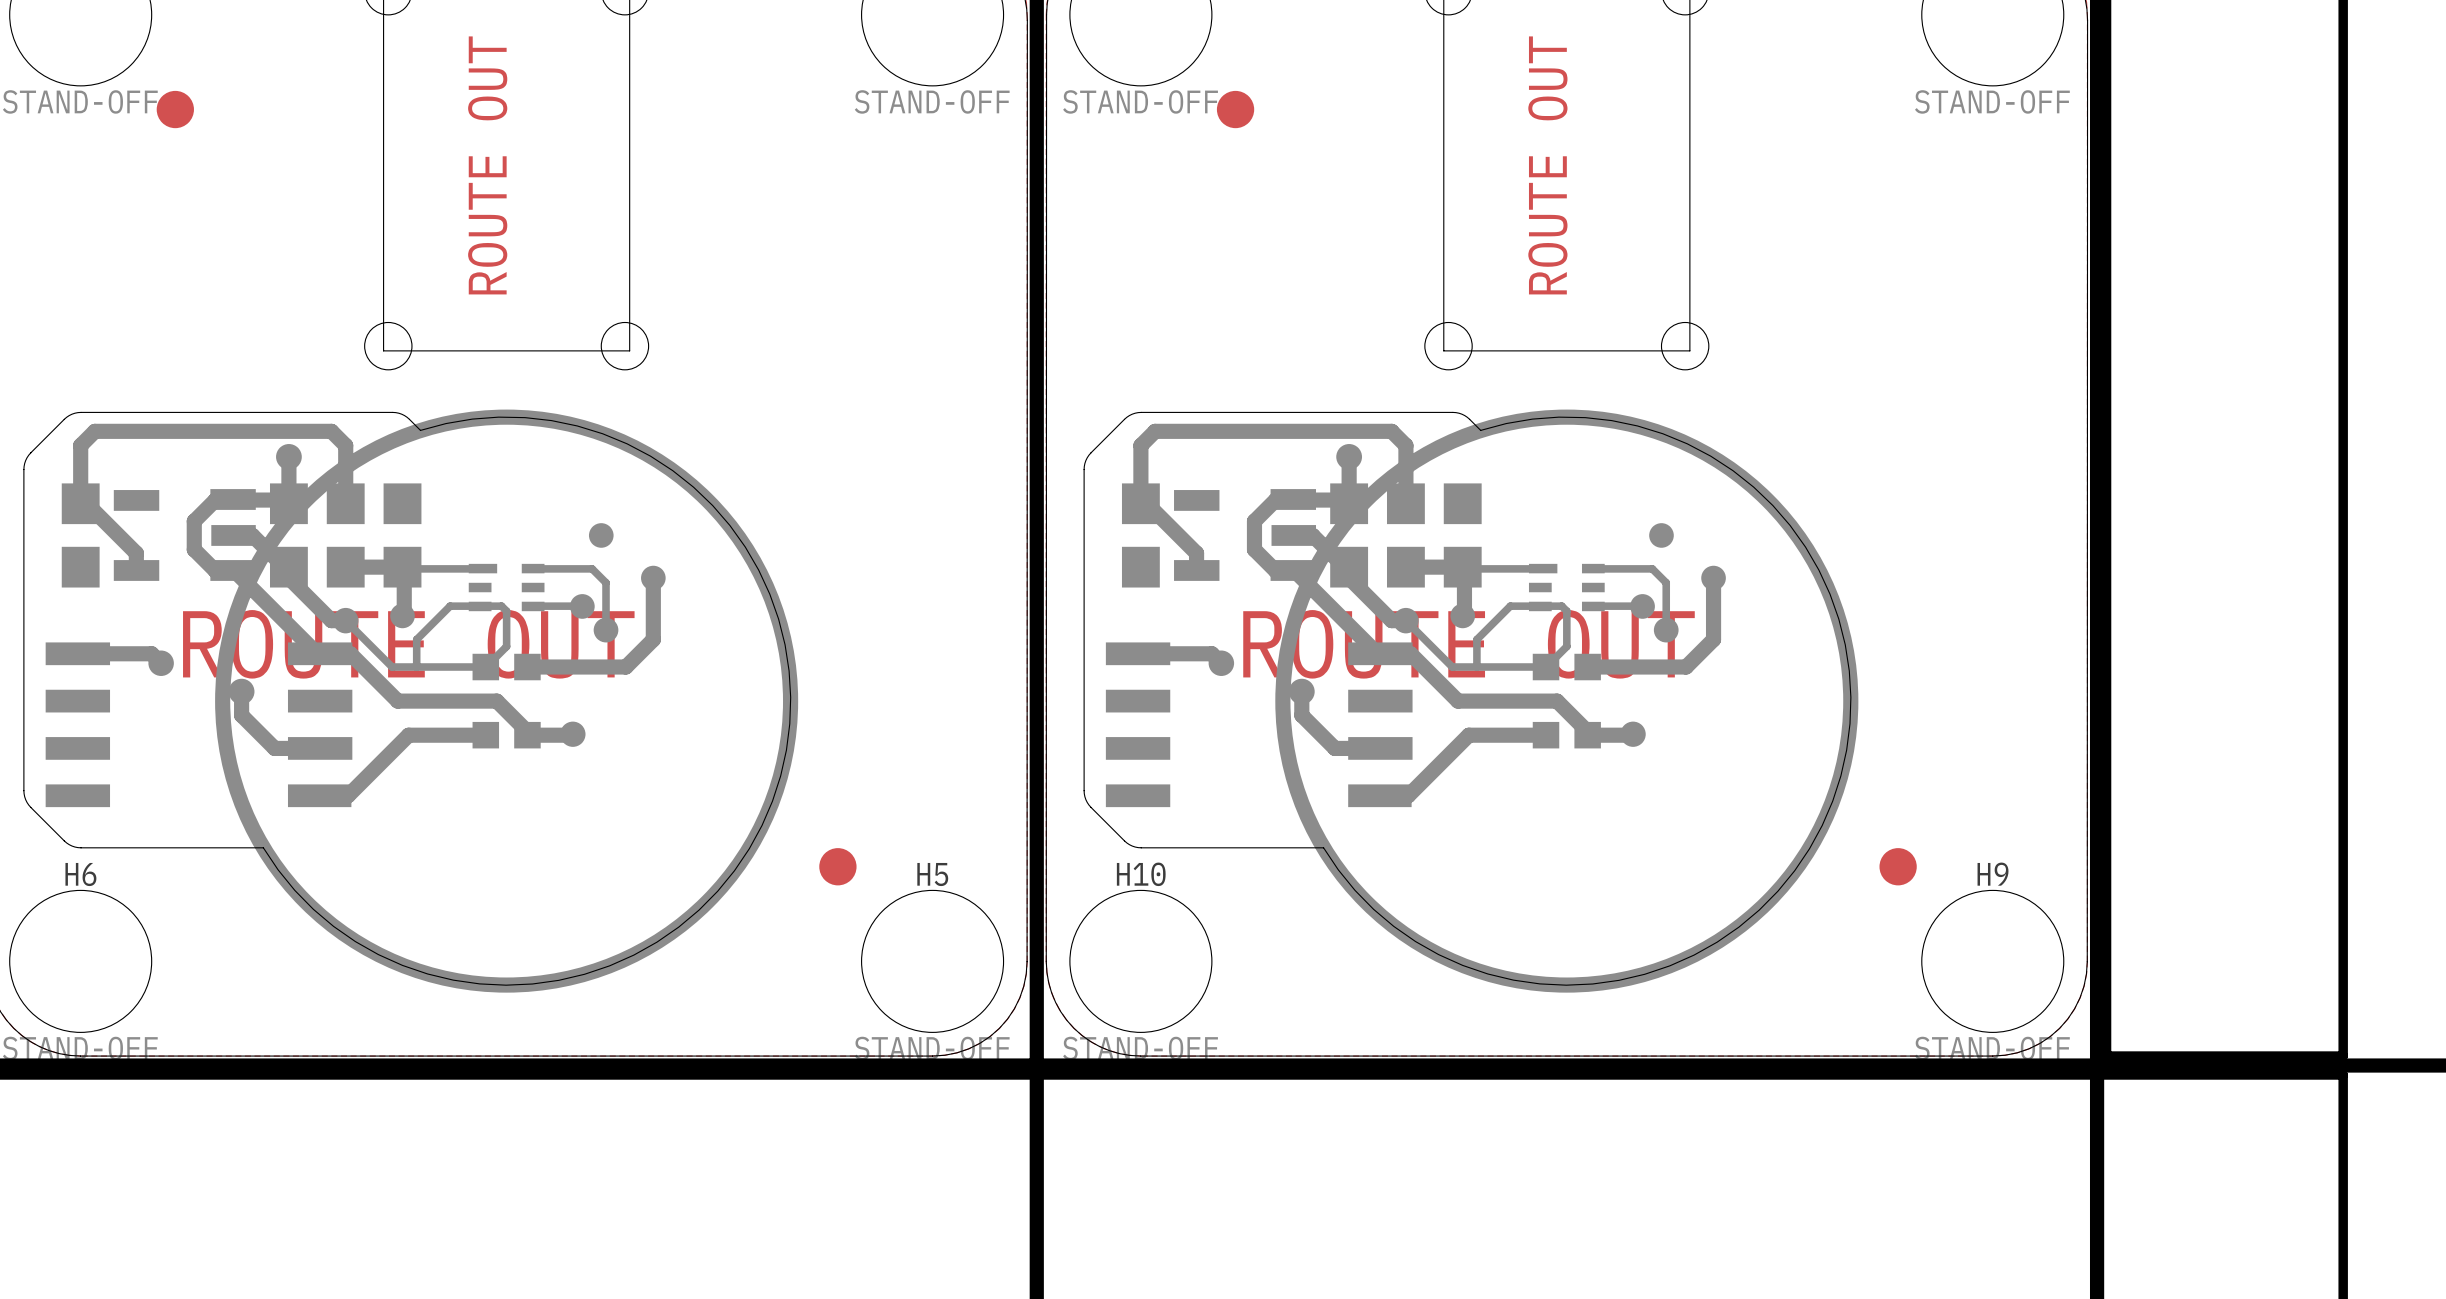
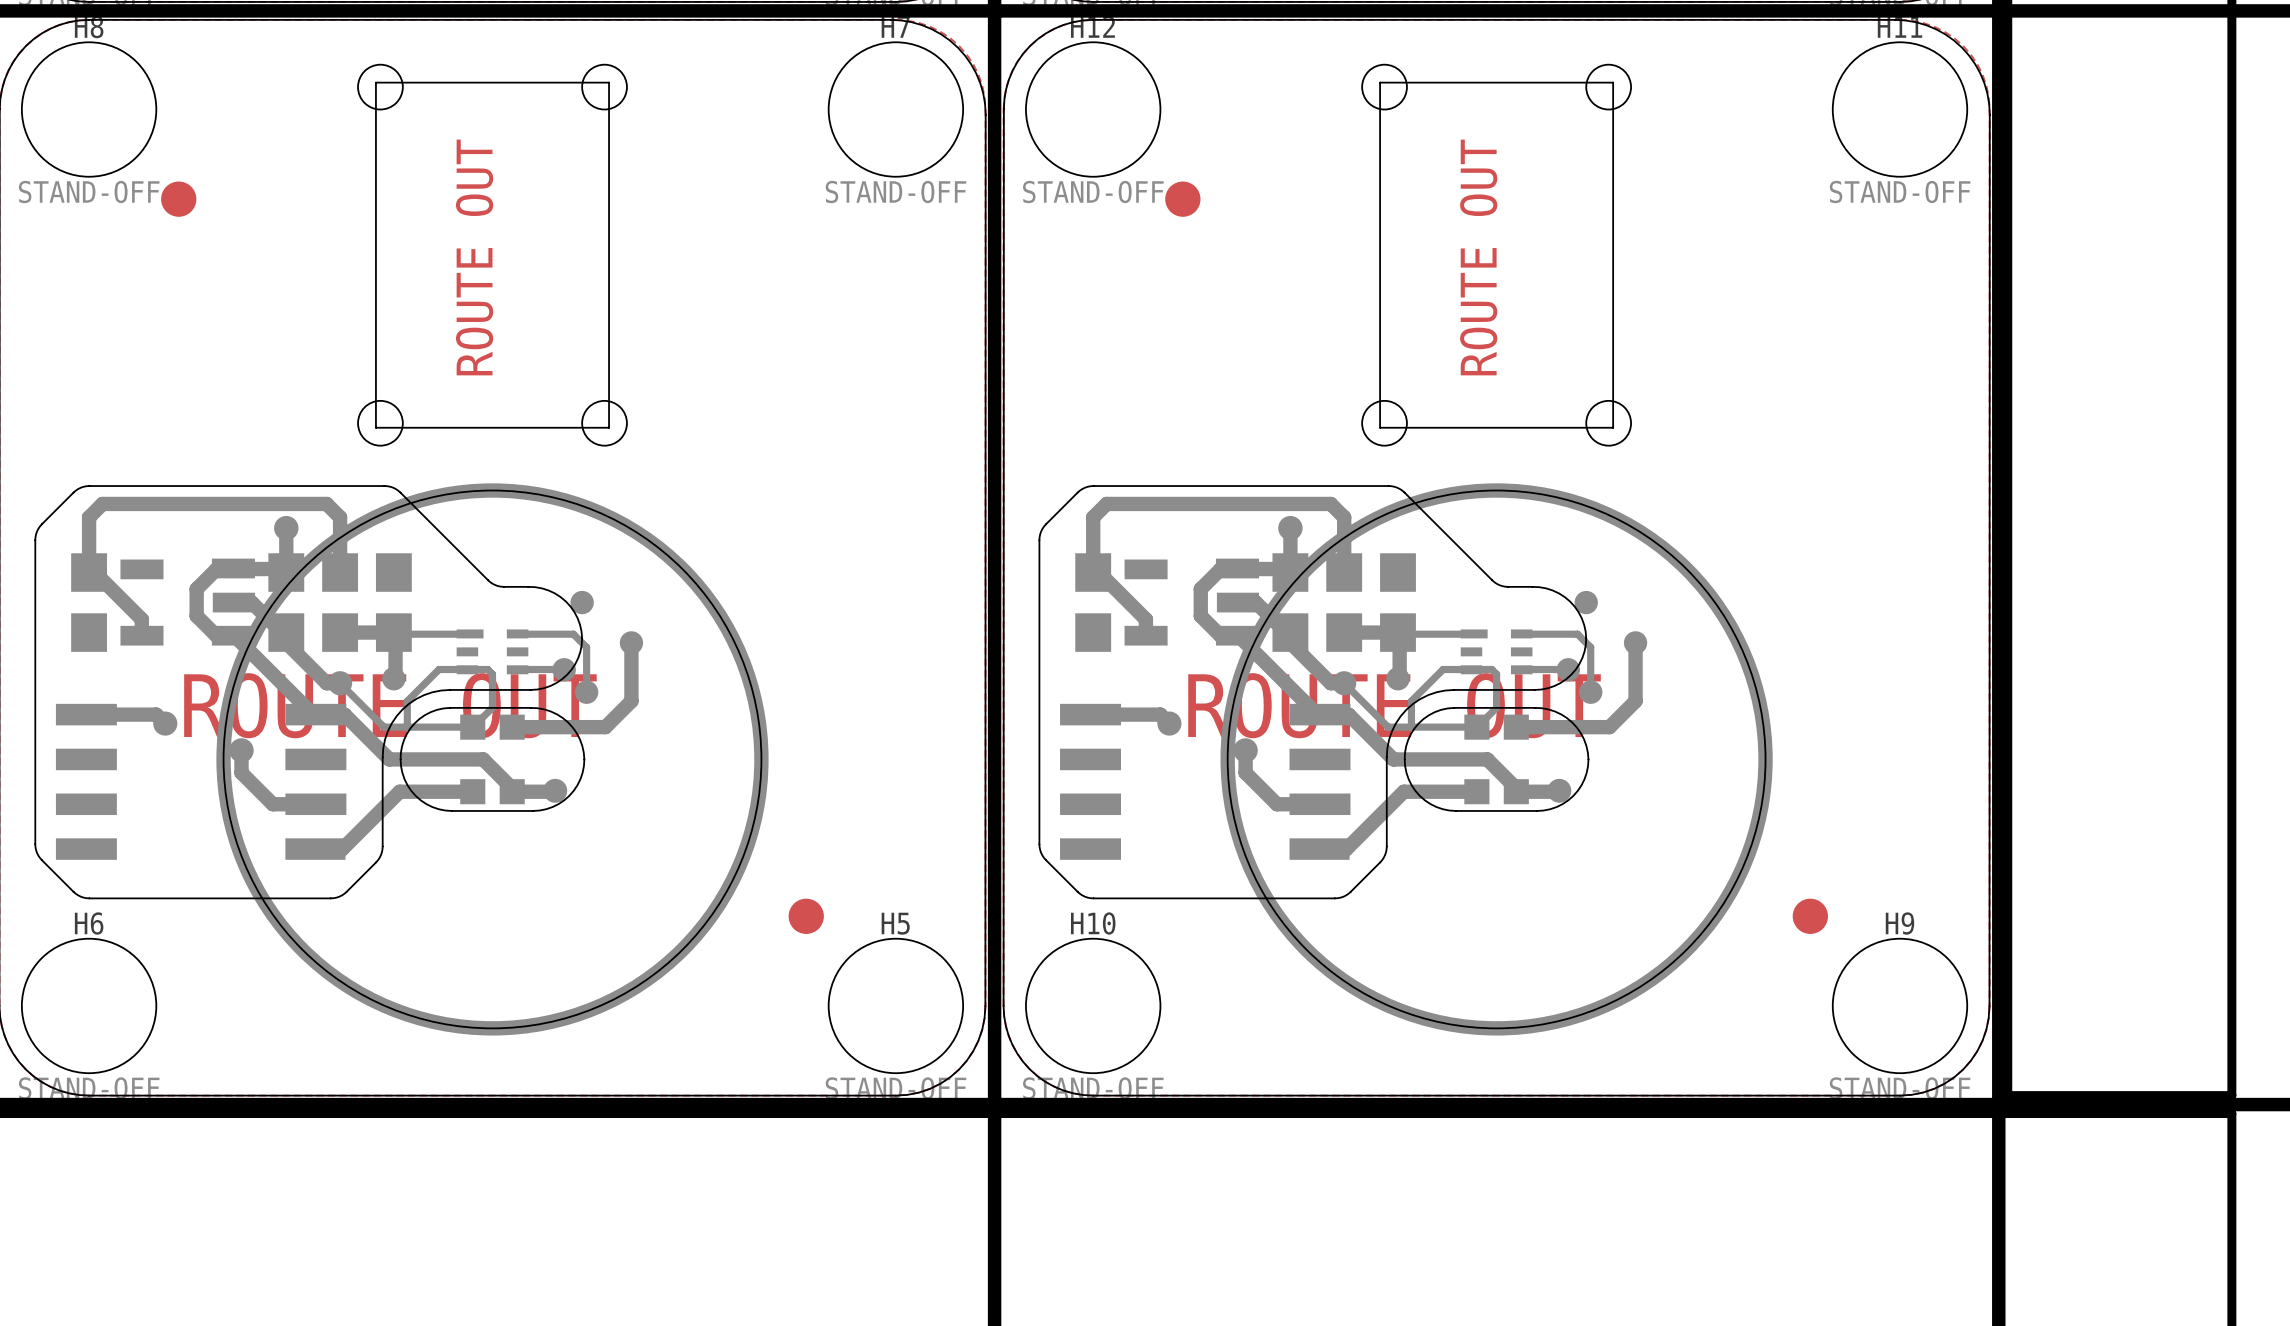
round board edge: none -> [223, 490, 762, 1029]
round board edge: none -> [1227, 490, 1766, 1029]
board edge: (420, 430) (472, 419) (498, 417) (551, 420) (577, 425) (602, 433) (650, 456) (672, 470) (712, 505) (745, 547) (758, 570) (769, 594) (785, 644) (790, 697) (789, 723) (786, 750) (772, 801) (749, 848) (734, 870) (699, 910) (678, 927) (656, 942) (609, 965) (584, 974) (532, 983) (506, 985) (453, 980) (402, 965) (378, 954) (333, 926) (313, 909) (294, 890) (263, 847) -> (410, 503) (492, 583) (501, 586) (542, 588) (554, 593) (565, 601) (577, 618) (581, 631) (581, 645) (578, 658) (567, 674) (556, 683) (543, 688) (441, 690) (424, 695) (408, 703) (391, 723) (383, 748) (382, 846) (378, 860) (346, 891) (336, 897) (262, 898)
board edge: (1480, 430) (1532, 419) (1558, 417) (1611, 420) (1637, 425) (1662, 433) (1710, 456) (1733, 470) (1772, 505) (1790, 525) (1818, 570) (1829, 594) (1845, 644) (1849, 670) (1850, 723) (1846, 750) (1832, 801) (1809, 848) (1794, 870) (1759, 910) (1738, 927) (1717, 942) (1669, 965) (1644, 974) (1592, 983) (1566, 985) (1513, 980) (1487, 973) (1438, 954) (1393, 926) (1373, 909) (1338, 869) (1323, 847) -> (1415, 503) (1496, 583) (1505, 586) (1546, 588) (1558, 593) (1570, 601) (1578, 612) (1585, 631) (1585, 645) (1582, 658) (1575, 669) (1566, 679) (1548, 688) (1445, 690) (1428, 695) (1413, 703) (1395, 723) (1387, 748) (1386, 846) (1382, 860) (1350, 891) (1340, 897) (1266, 898)
board edge: none -> (449, 707) (537, 708) (557, 714) (572, 727) (582, 745) (583, 766) (577, 785) (564, 800) (552, 807) (539, 810) (452, 810) (438, 809) (426, 804) (411, 790) (404, 779) (401, 766) (402, 746) (406, 734) (419, 718) (436, 709) (449, 707)
board edge: none -> (1454, 707) (1541, 708) (1561, 714) (1576, 727) (1586, 745) (1588, 766) (1581, 785) (1568, 800) (1556, 807) (1543, 810) (1456, 810) (1442, 809) (1430, 804) (1415, 790) (1408, 779) (1405, 766) (1406, 746) (1410, 734) (1423, 718) (1434, 712) (1454, 707)

